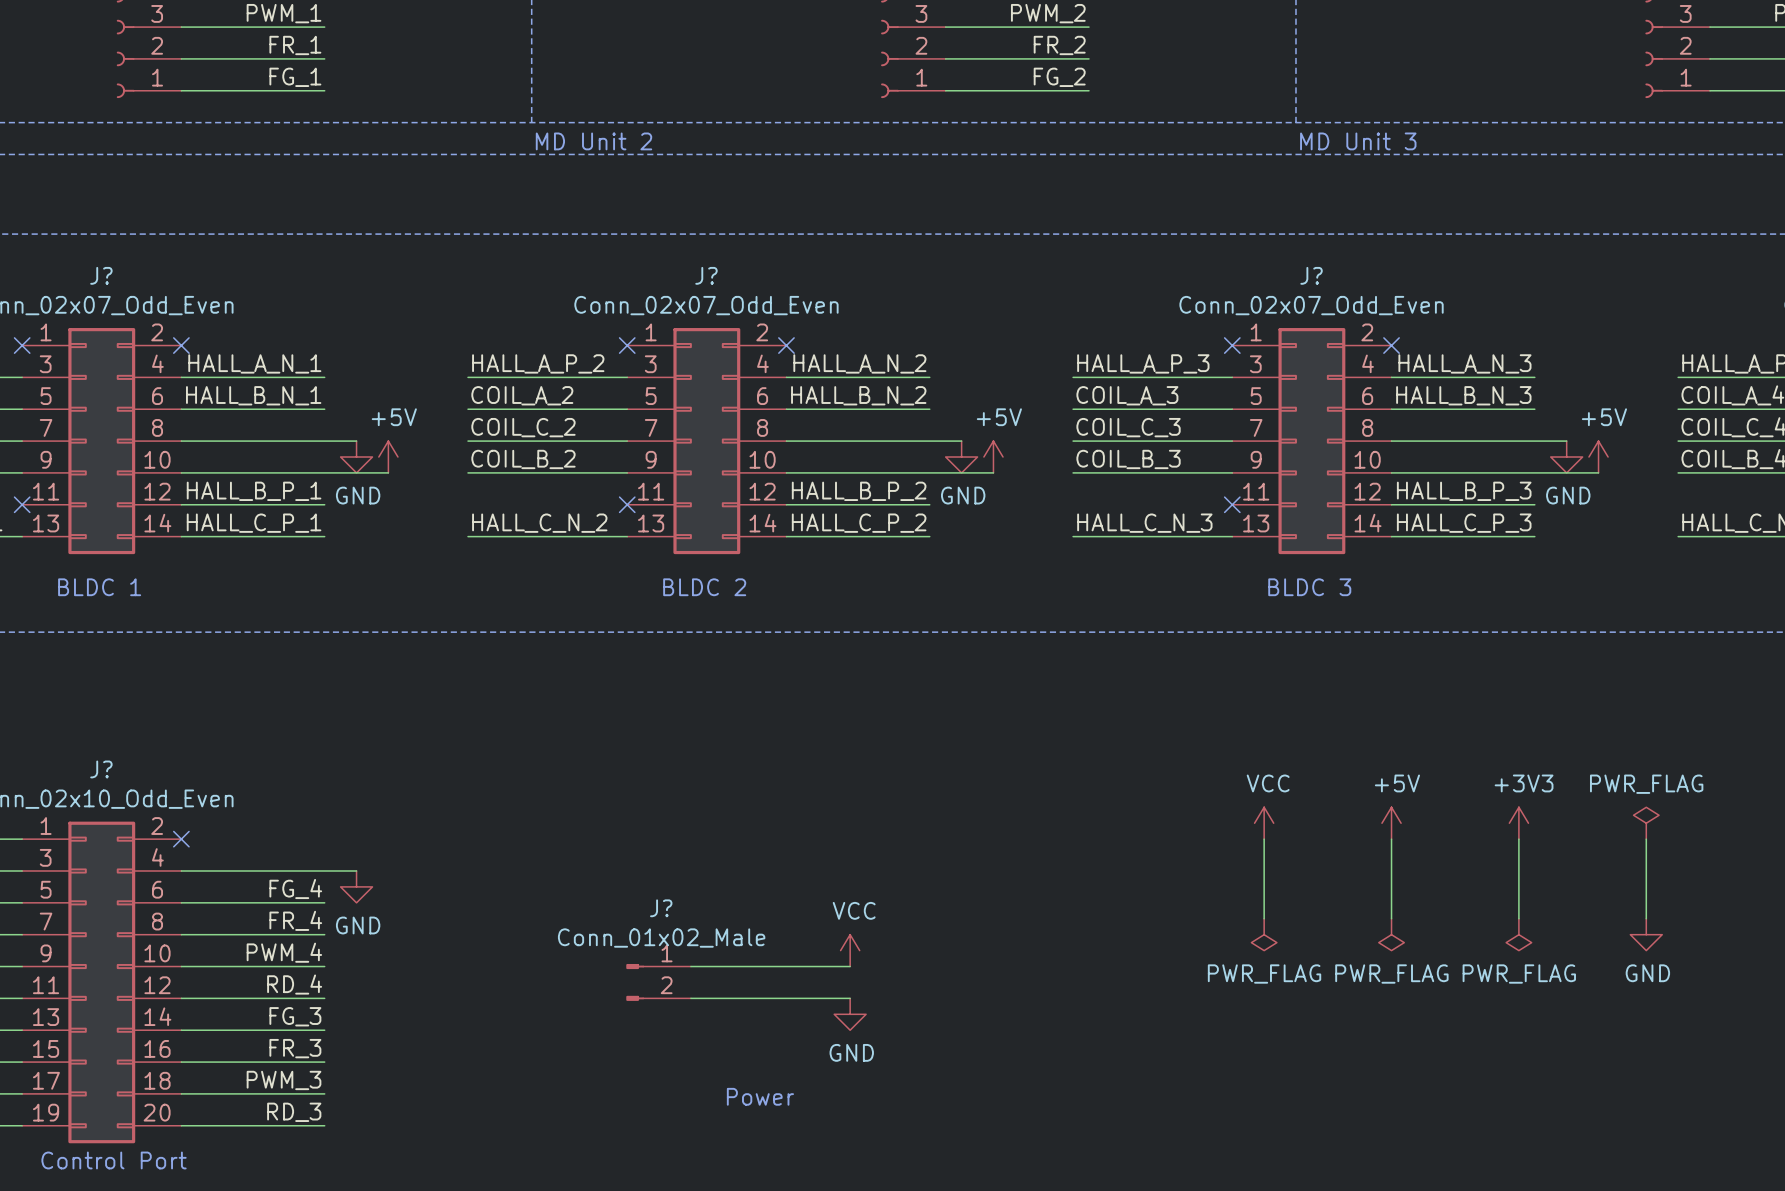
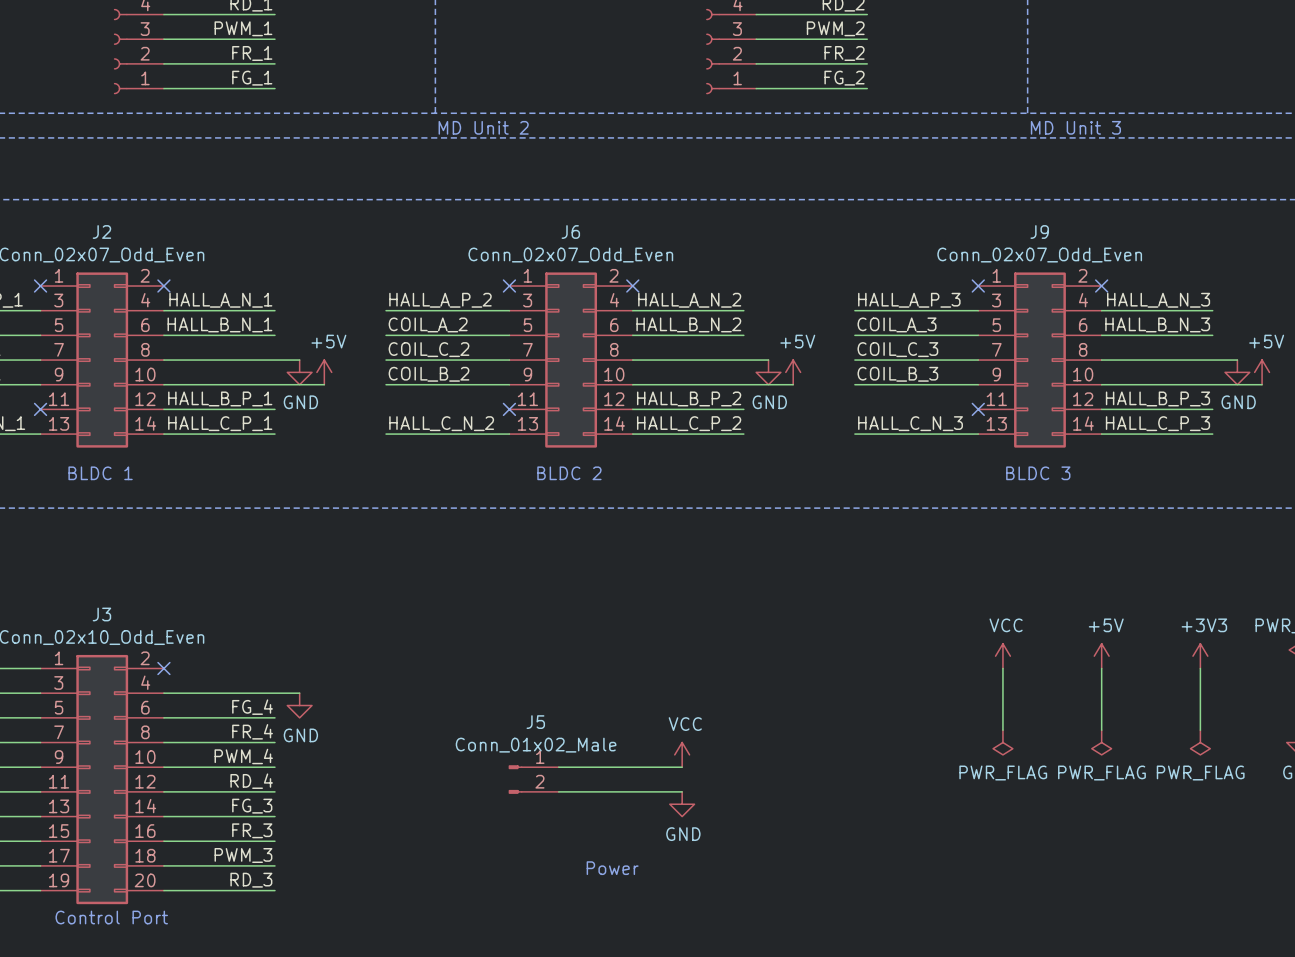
J? name: J? (101, 275) -> J2 (101, 231)
J? name: J? (706, 275) -> J6 (570, 231)
J? name: J? (1311, 275) -> J9 (1039, 231)
J? name: J? (101, 769) -> J3 (101, 614)
J? name: J? (661, 908) -> J5 (535, 722)

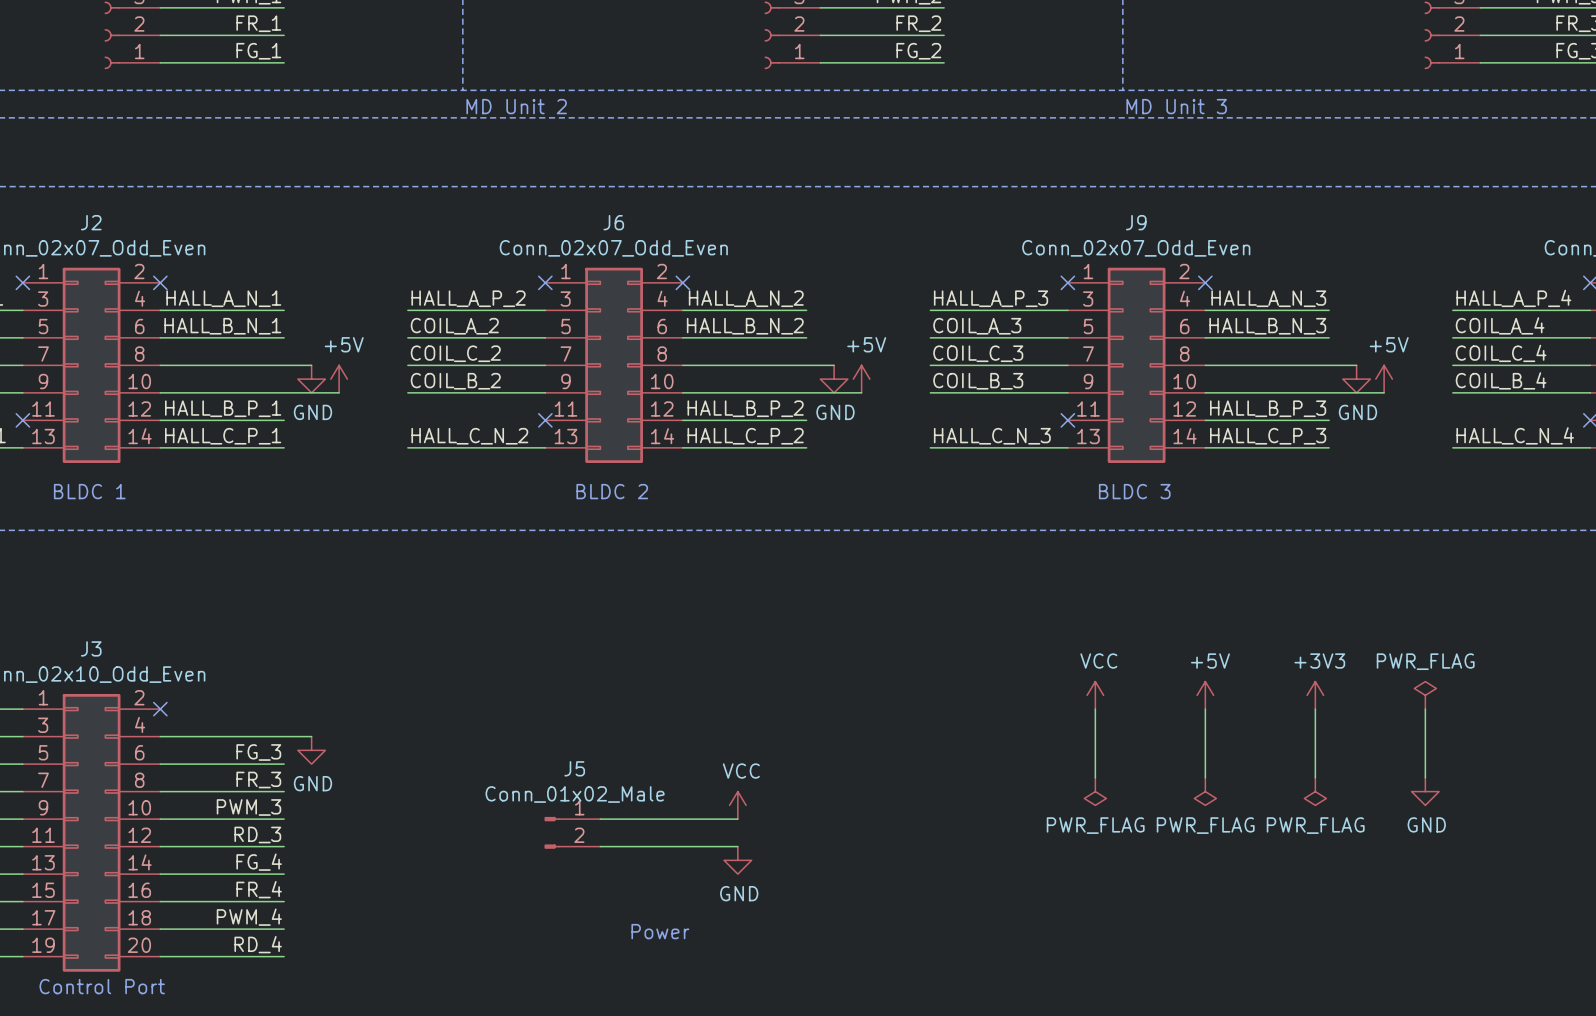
label: FG_4 (252, 707) -> FG_3 (258, 752)
label: FR_4 (252, 731) -> FR_3 (258, 779)
label: PWM_4 (243, 756) -> PWM_3 (248, 807)
label: RD_4 (251, 781) -> RD_3 (257, 834)
label: FG_3 (252, 806) -> FG_4 (259, 862)
label: FR_3 (252, 830) -> FR_4 (259, 889)
label: PWM_3 (243, 855) -> PWM_4 (249, 917)
label: RD_3 (251, 880) -> RD_4 (258, 944)

